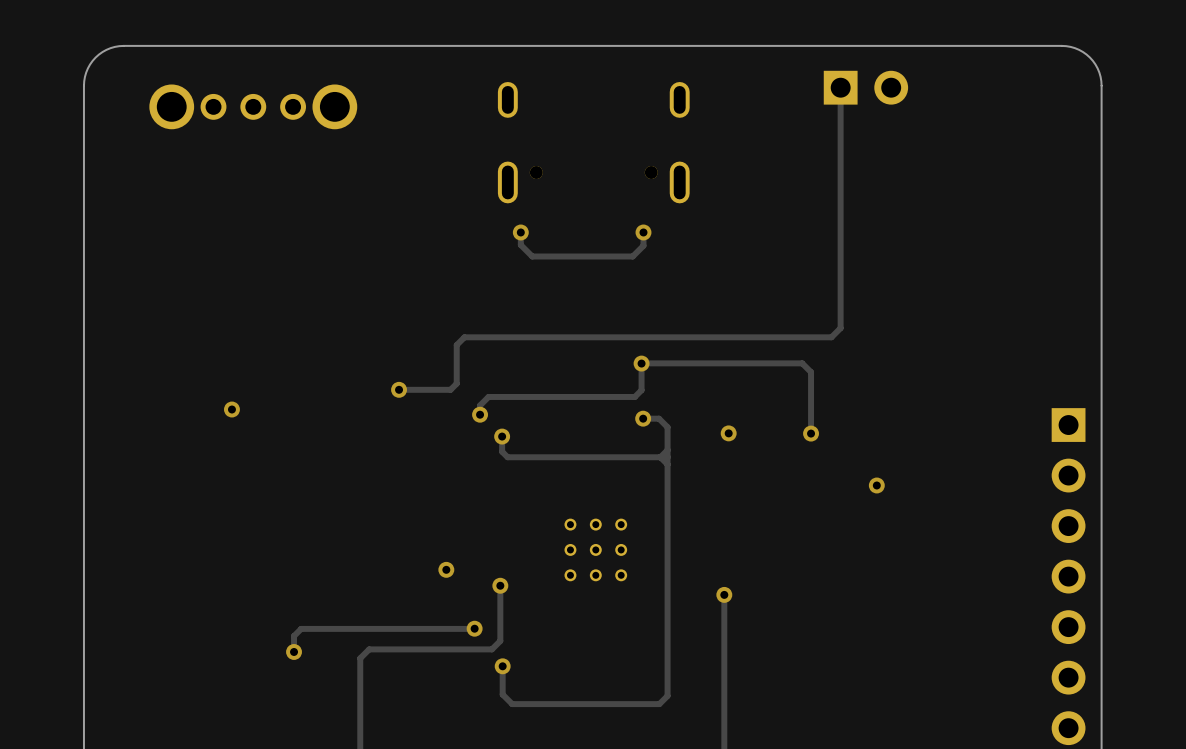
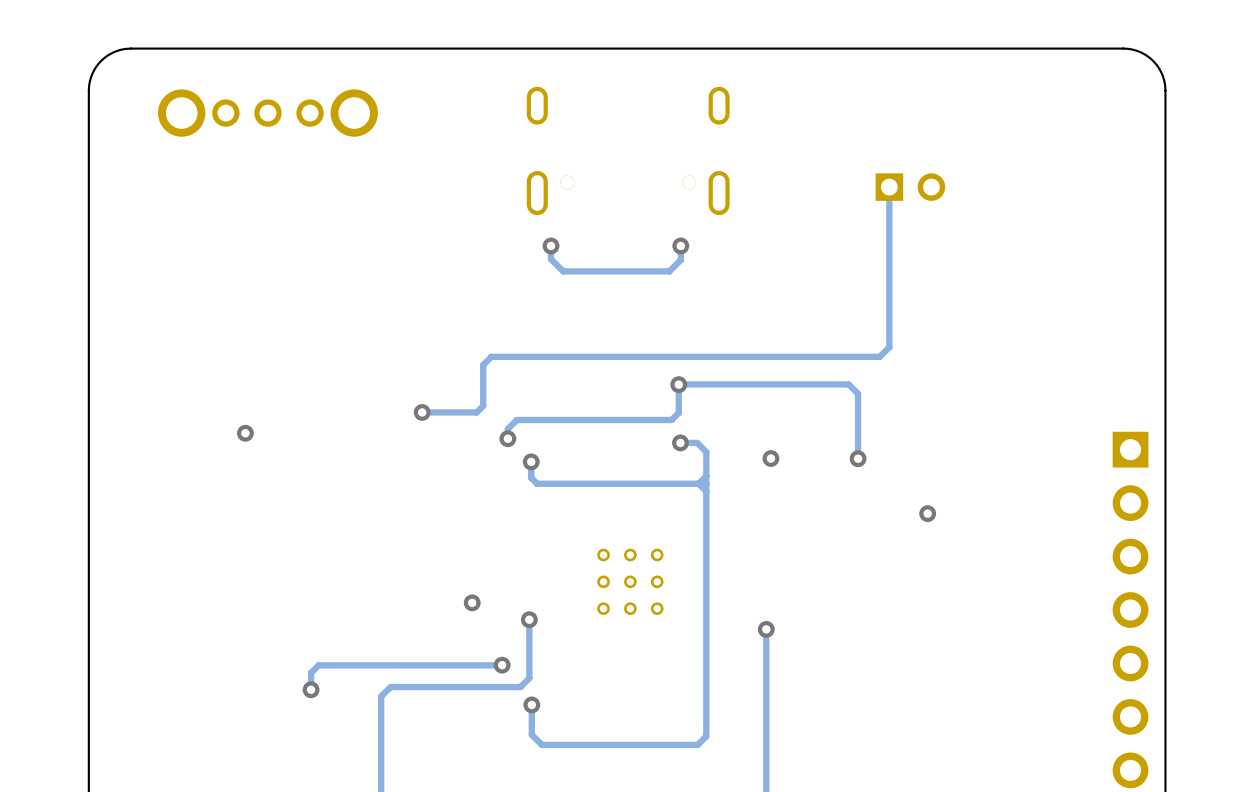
track: (840, 87) (840, 176) -> none
part: (865, 87) -> none
part: none -> (910, 187)

